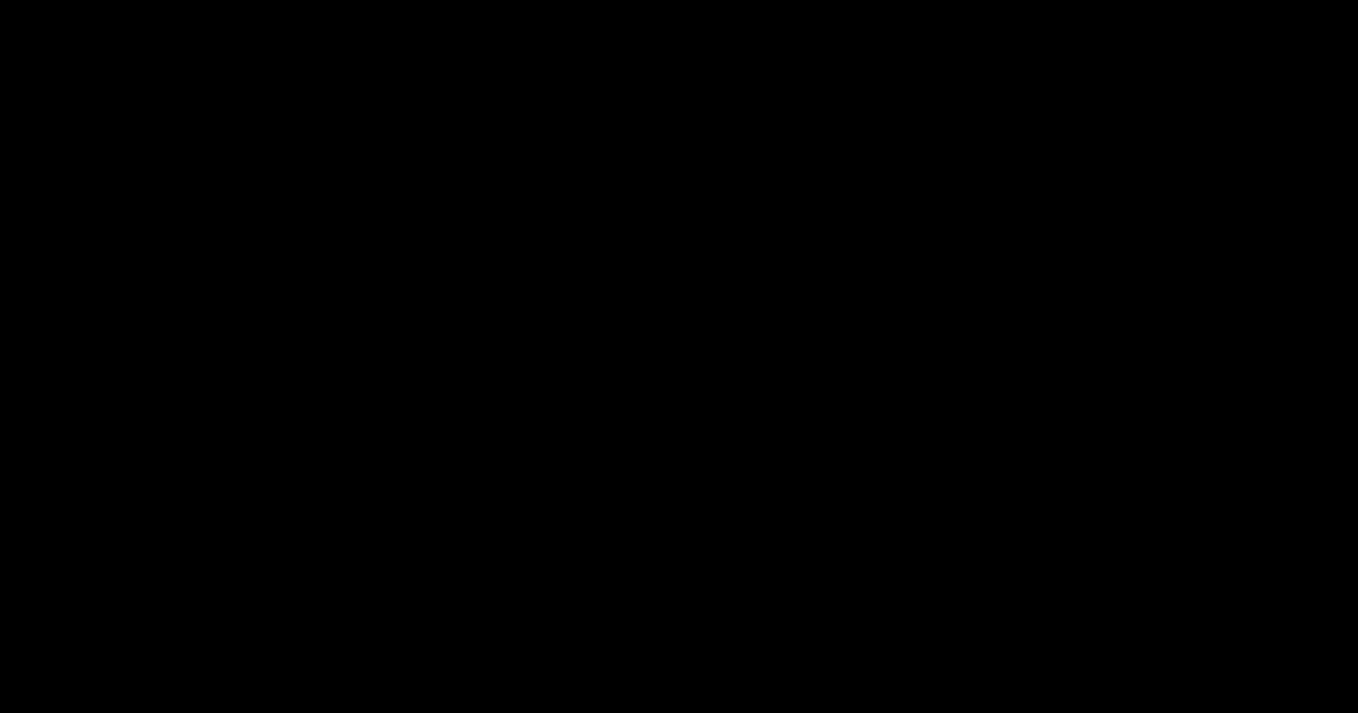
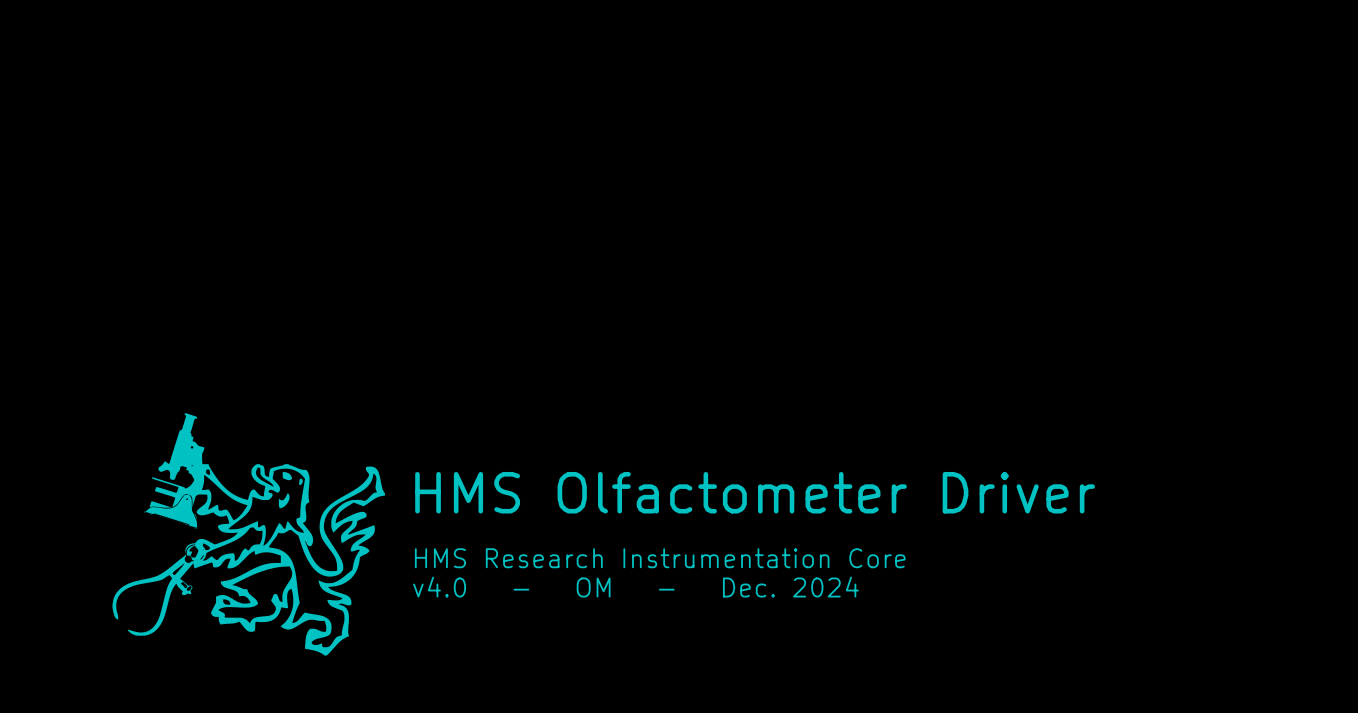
drawing: none -> [112, 413, 386, 656]
text: none -> HMS Olfactometer Driver (755, 492)
text: none -> HMS Research Instrumentation Core (660, 558)
text: none -> v4.0 - OM - Dec. 2024 (636, 587)

